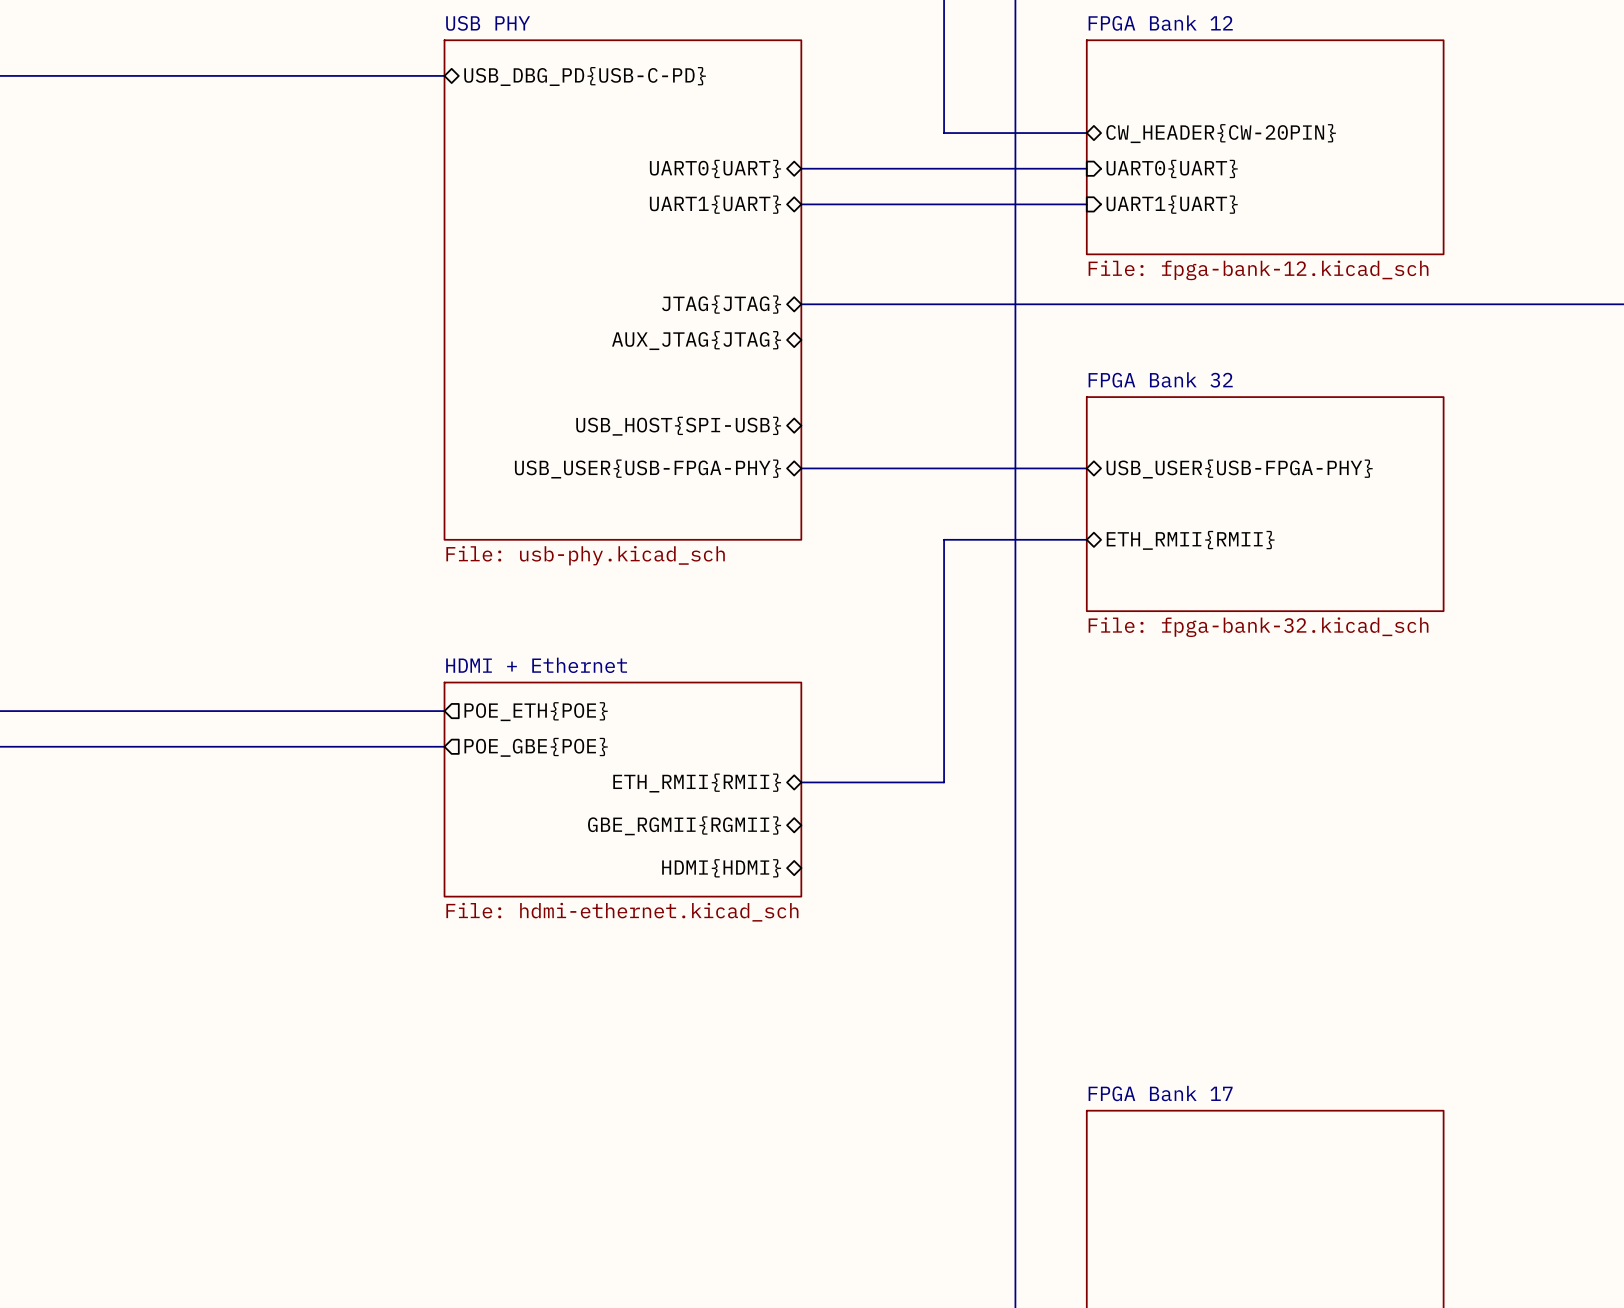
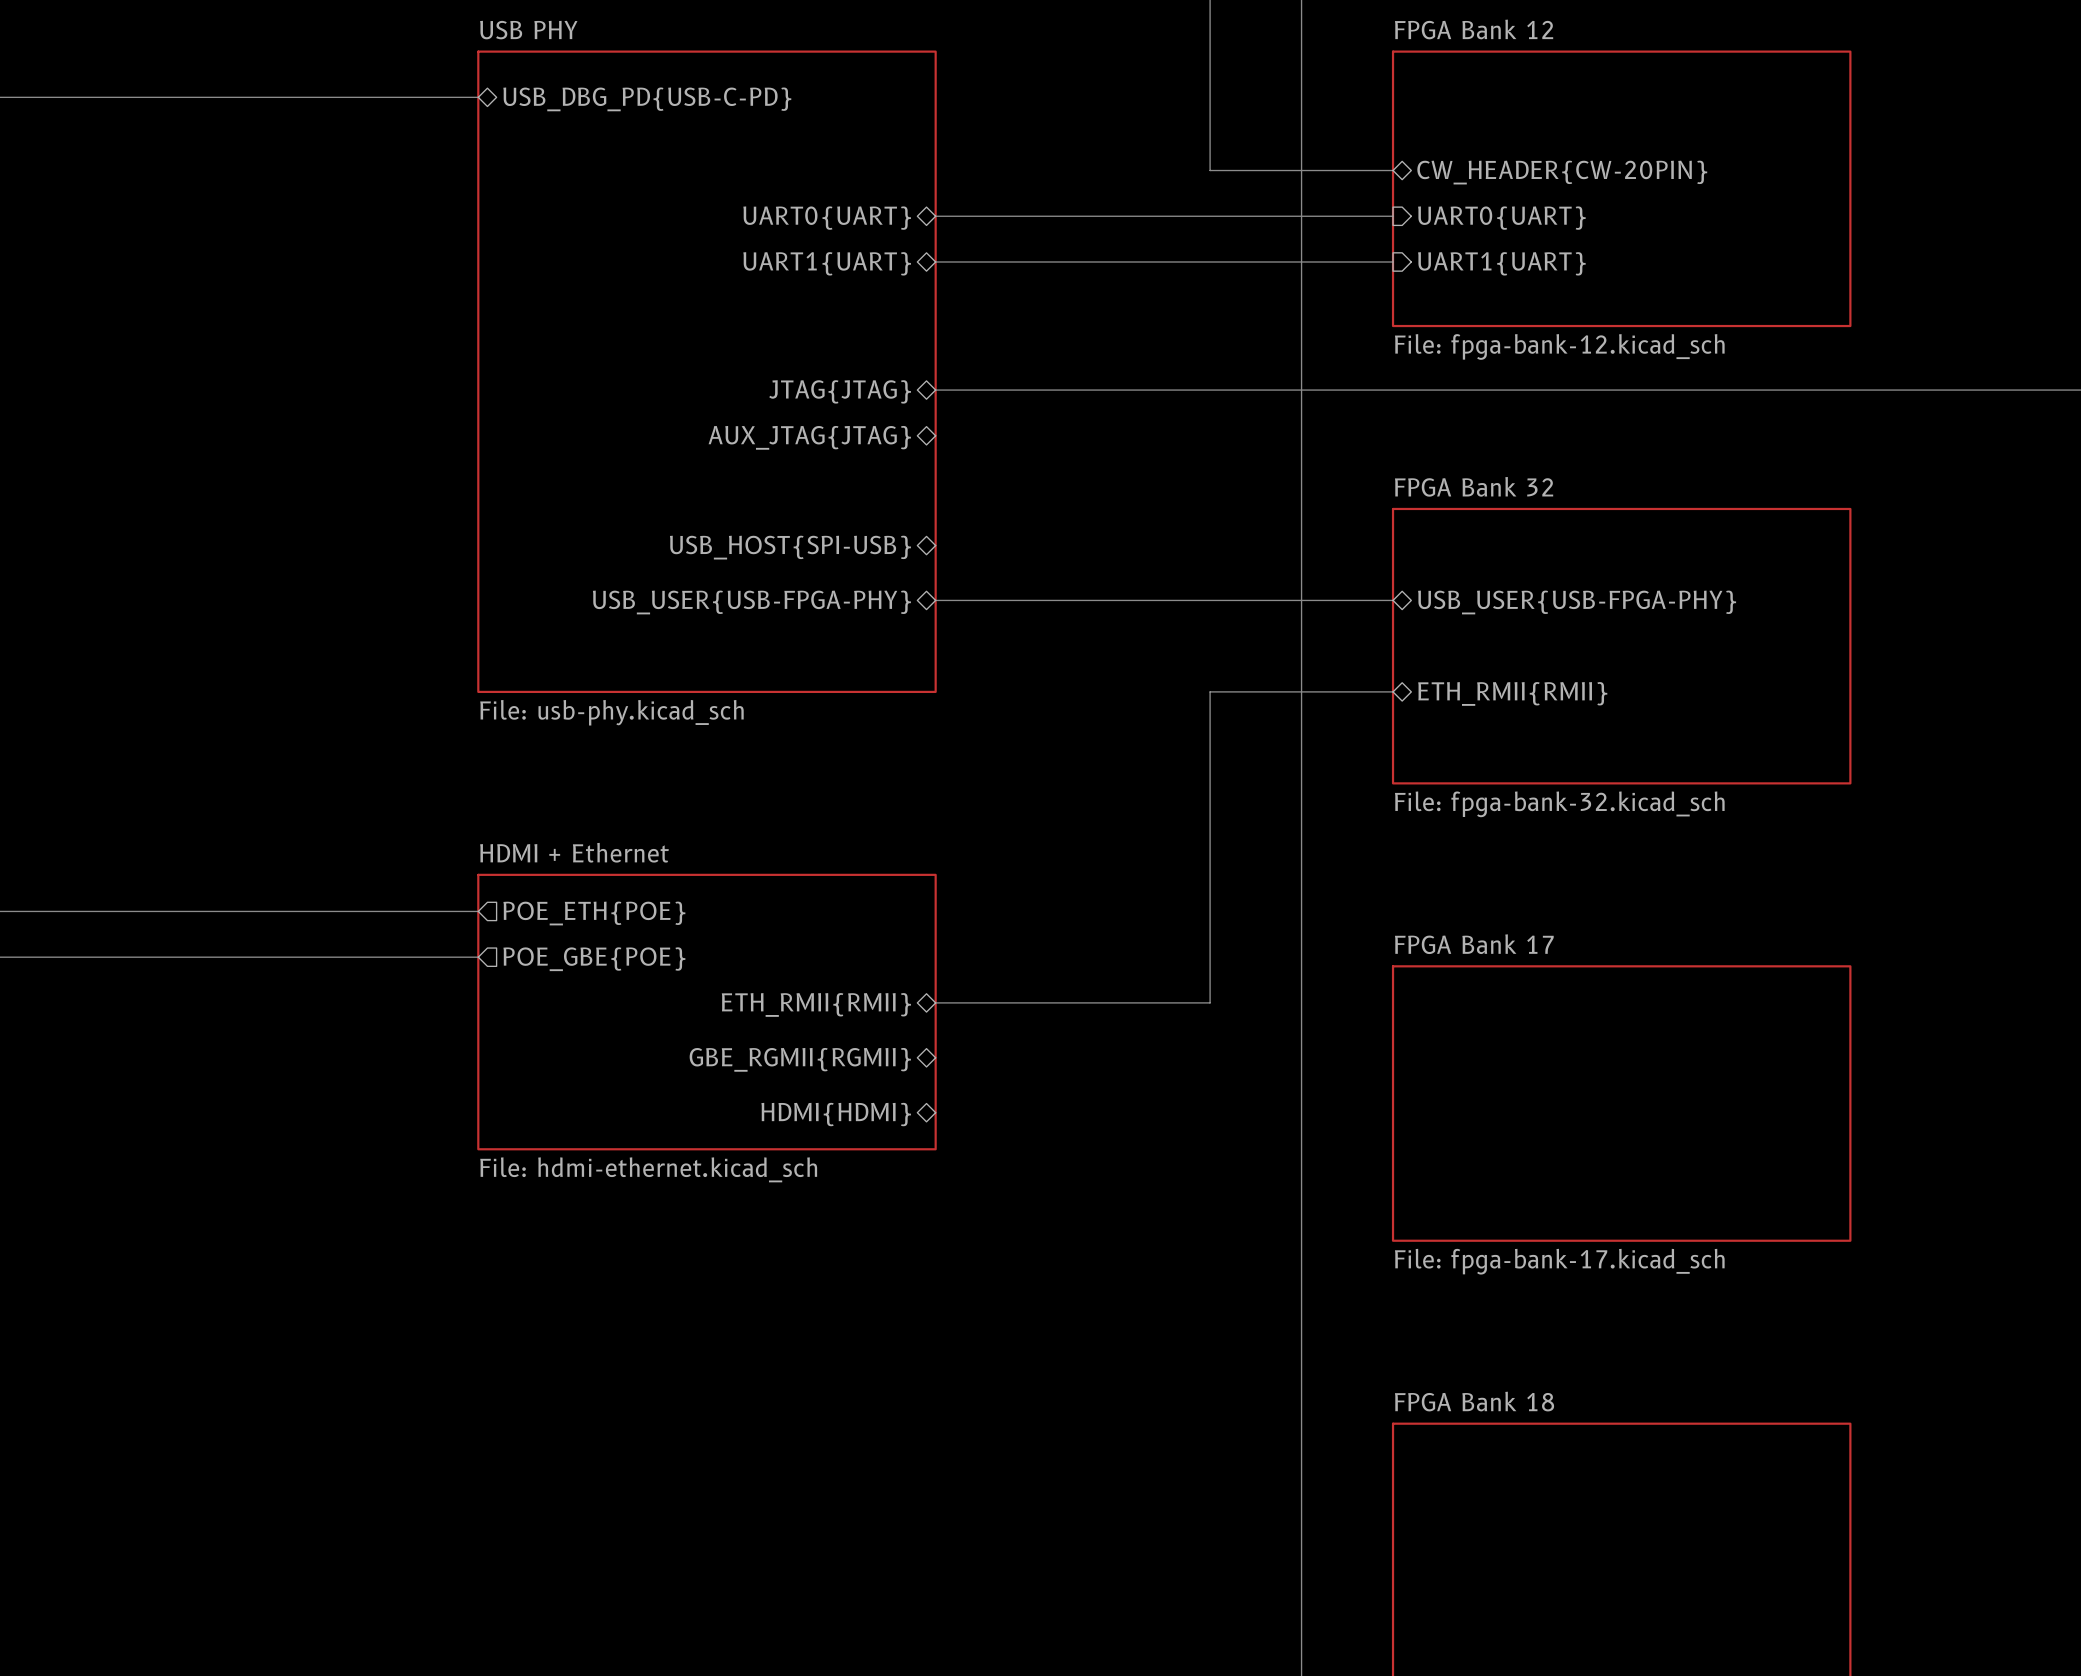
bus: (373, 75) (444, 75) -> none
sheet pin position: USB_DBG_PD{USB-C-PD} (585, 76) -> USB_DBG_PD{USB-C-PD} (647, 99)
sheet pin position: UART0{UART} (715, 168) -> UART0{UART} (827, 218)
bus: none -> (935, 216) (1027, 216)
sheet pin position: UART1{UART} (715, 204) -> UART1{UART} (827, 263)
bus: none -> (935, 261) (1027, 261)
sheet USB PHY position: (622, 290) -> (706, 371)
sheet pin position: JTAG{JTAG} (721, 304) -> JTAG{JTAG} (840, 391)
bus: none -> (935, 390) (1027, 390)
sheet pin position: AUX_JTAG{JTAG} (696, 340) -> AUX_JTAG{JTAG} (809, 437)
sheet pin position: USB_HOST{SPI-USB} (678, 426) -> USB_HOST{SPI-USB} (790, 547)
bus: none -> (935, 600) (1027, 600)
sheet pin position: USB_USER{USB-FPGA-PHY} (647, 469) -> USB_USER{USB-FPGA-PHY} (751, 602)
bus: (373, 711) (444, 711) -> none
sheet pin position: POE_ETH{POE} (536, 711) -> POE_ETH{POE} (594, 913)
bus: (373, 746) (444, 746) -> none
sheet pin position: POE_GBE{POE} (536, 747) -> POE_GBE{POE} (594, 959)
bus: none -> (935, 1002) (1027, 1002)
sheet pin position: ETH_RMII{RMII} (697, 783) -> ETH_RMII{RMII} (816, 1004)
sheet HDMI + Ethernet position: (622, 789) -> (706, 1012)
sheet pin position: GBE_RGMII{RGMII} (684, 825) -> GBE_RGMII{RGMII} (800, 1059)
sheet FPGA Bank 17: none -> File: fpga-bank-17.kicad_sch (1621, 1103)
sheet pin position: HDMI{HDMI} (721, 868) -> HDMI{HDMI} (836, 1114)
sheet FPGA Bank 17 name: FPGA Bank 17 (1160, 1093) -> FPGA Bank 18 (1474, 1401)

